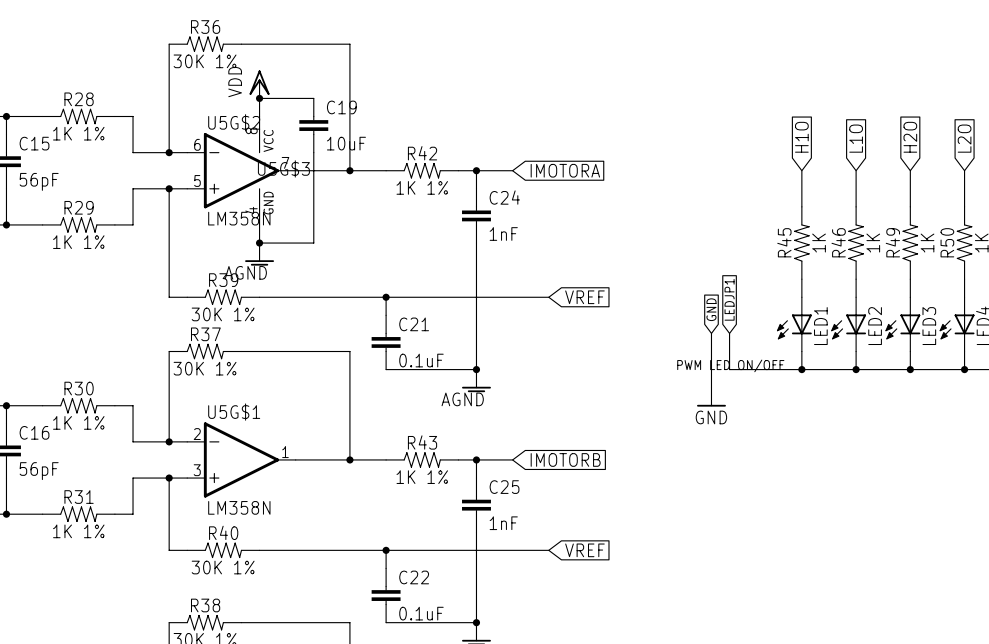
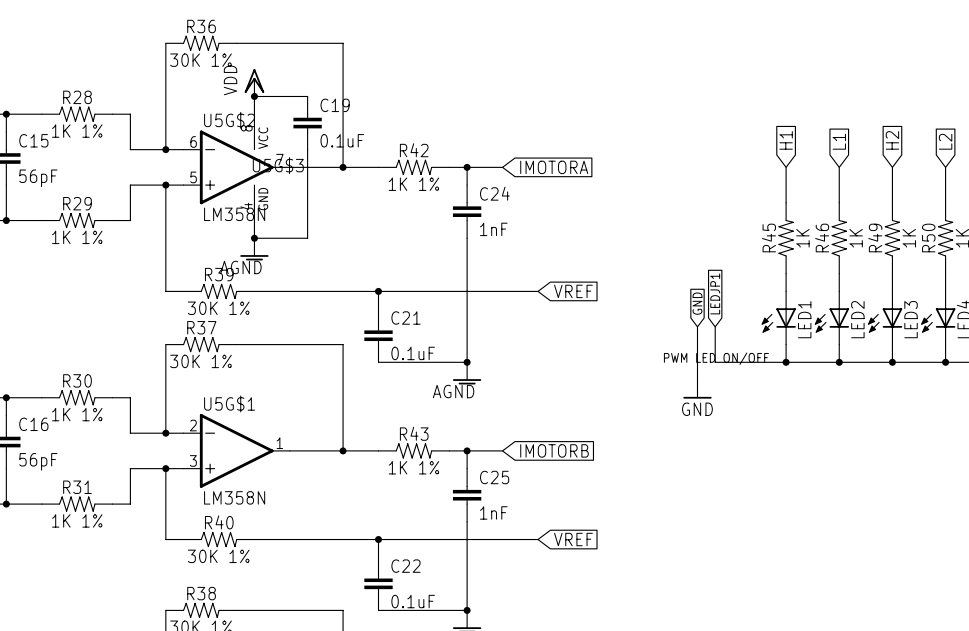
global label: H1O (801, 137) -> H1 (786, 140)
global label: H2O (910, 137) -> H2 (892, 140)
global label: L1O (856, 138) -> L1 (839, 141)
global label: L2O (964, 138) -> L2 (945, 141)
C19 value: 10uF (346, 143) -> 0.1uF (342, 140)

